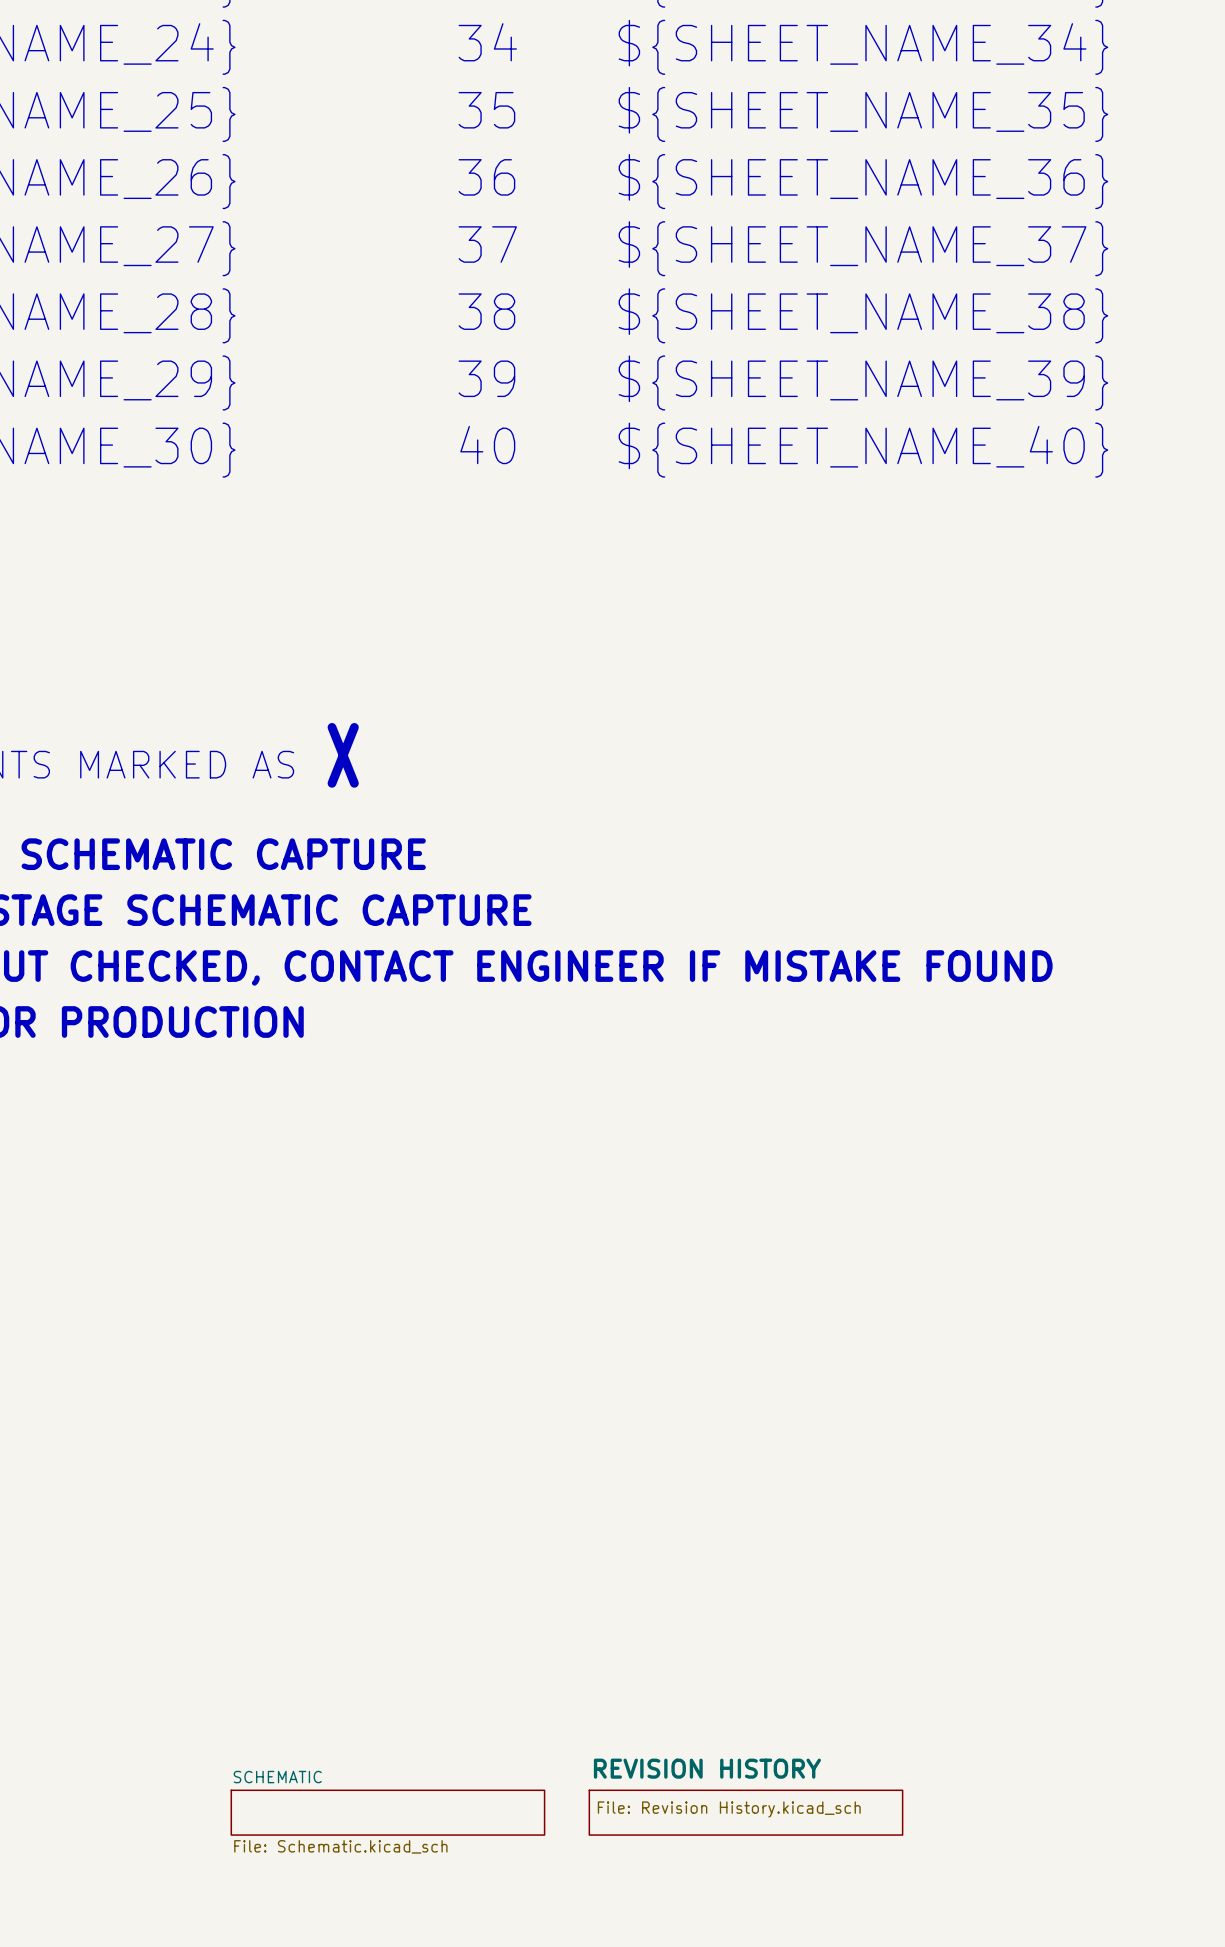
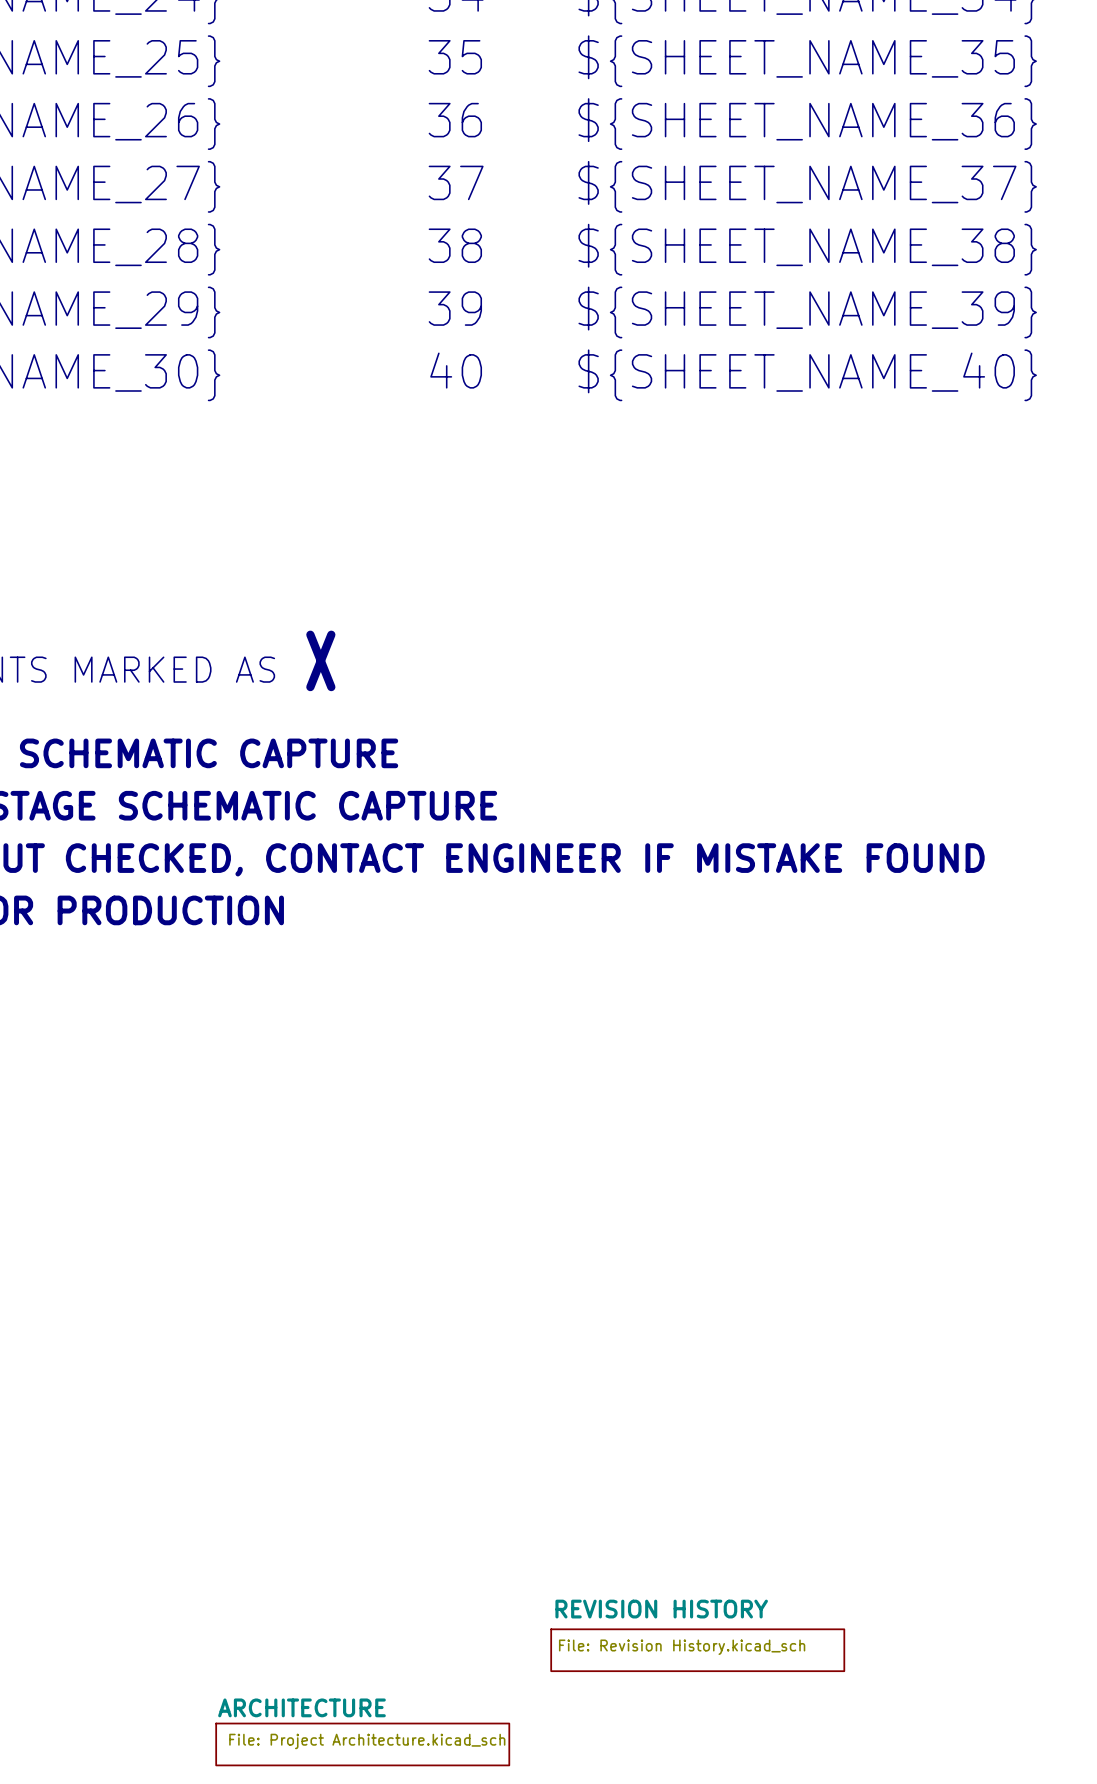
sheet SCHEMATIC: File: Schematic.kicad_sch (387, 1812) -> none
sheet ARCHITECTURE: none -> File: Project Architecture.kicad_sch (362, 1744)

